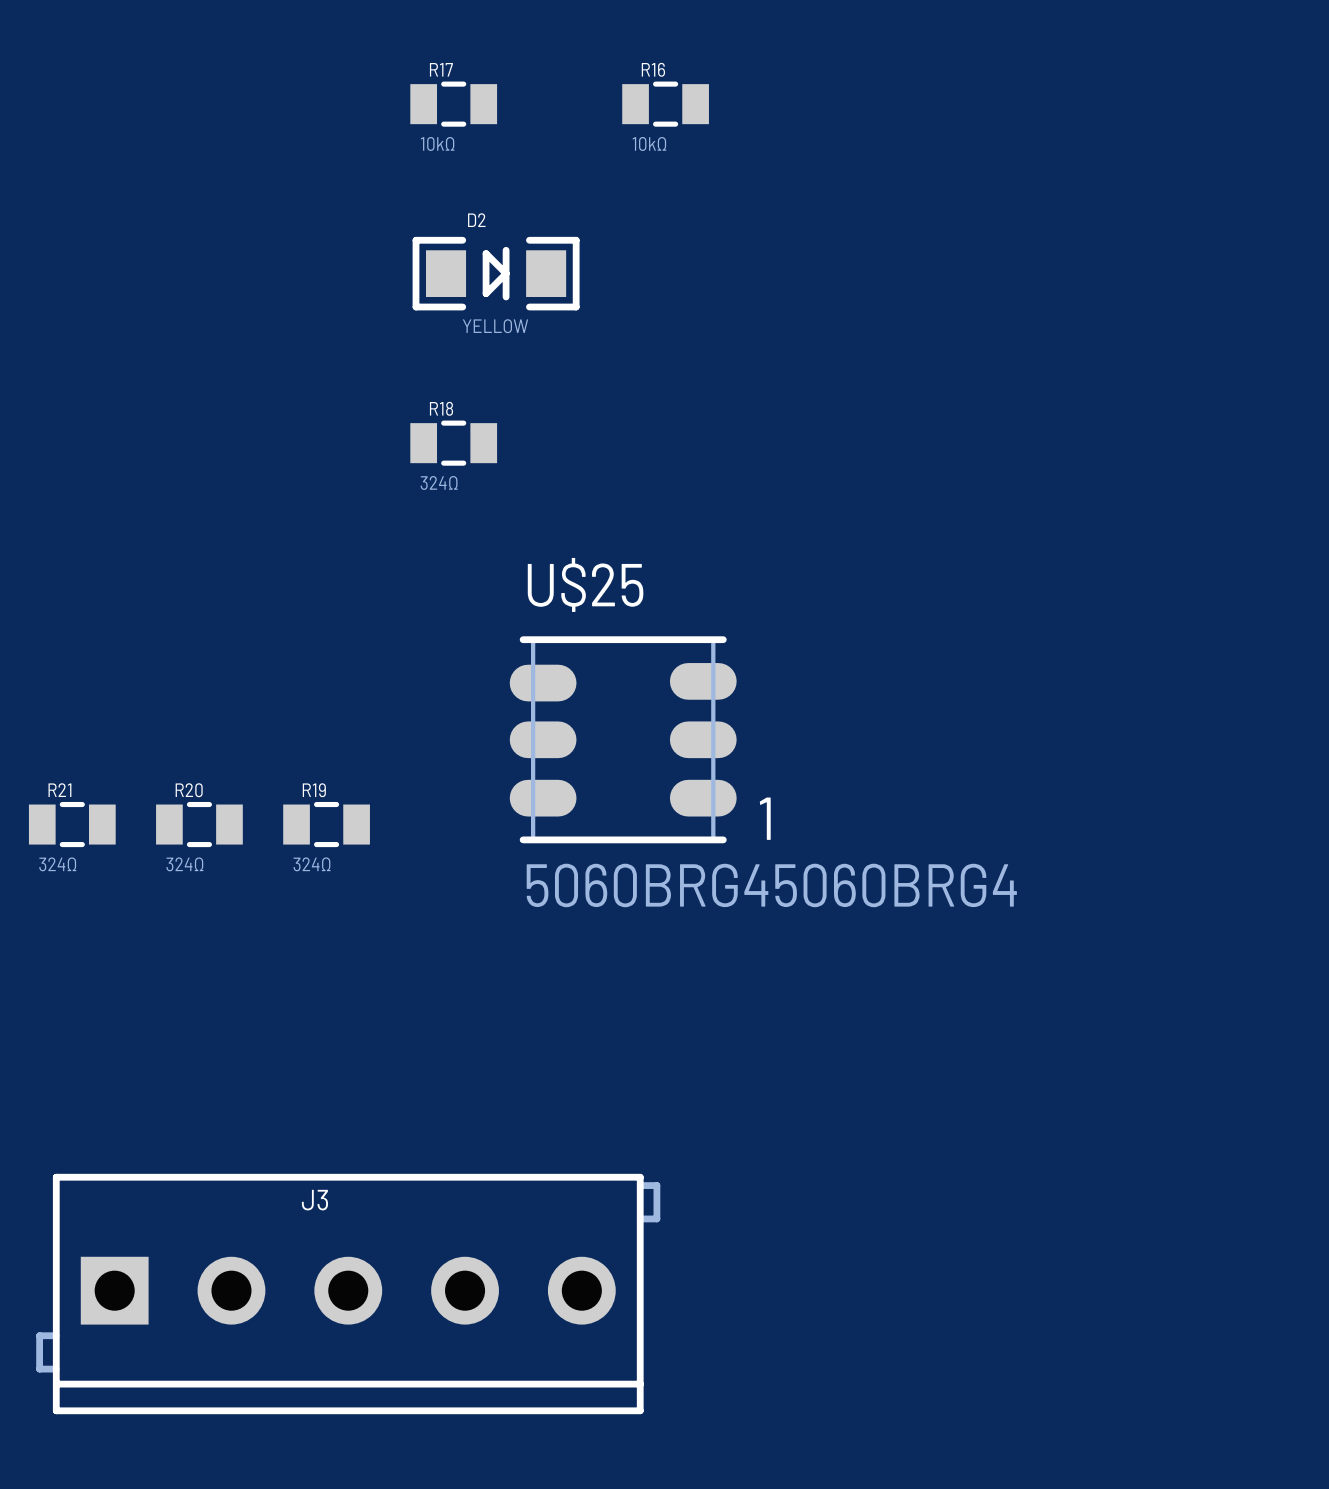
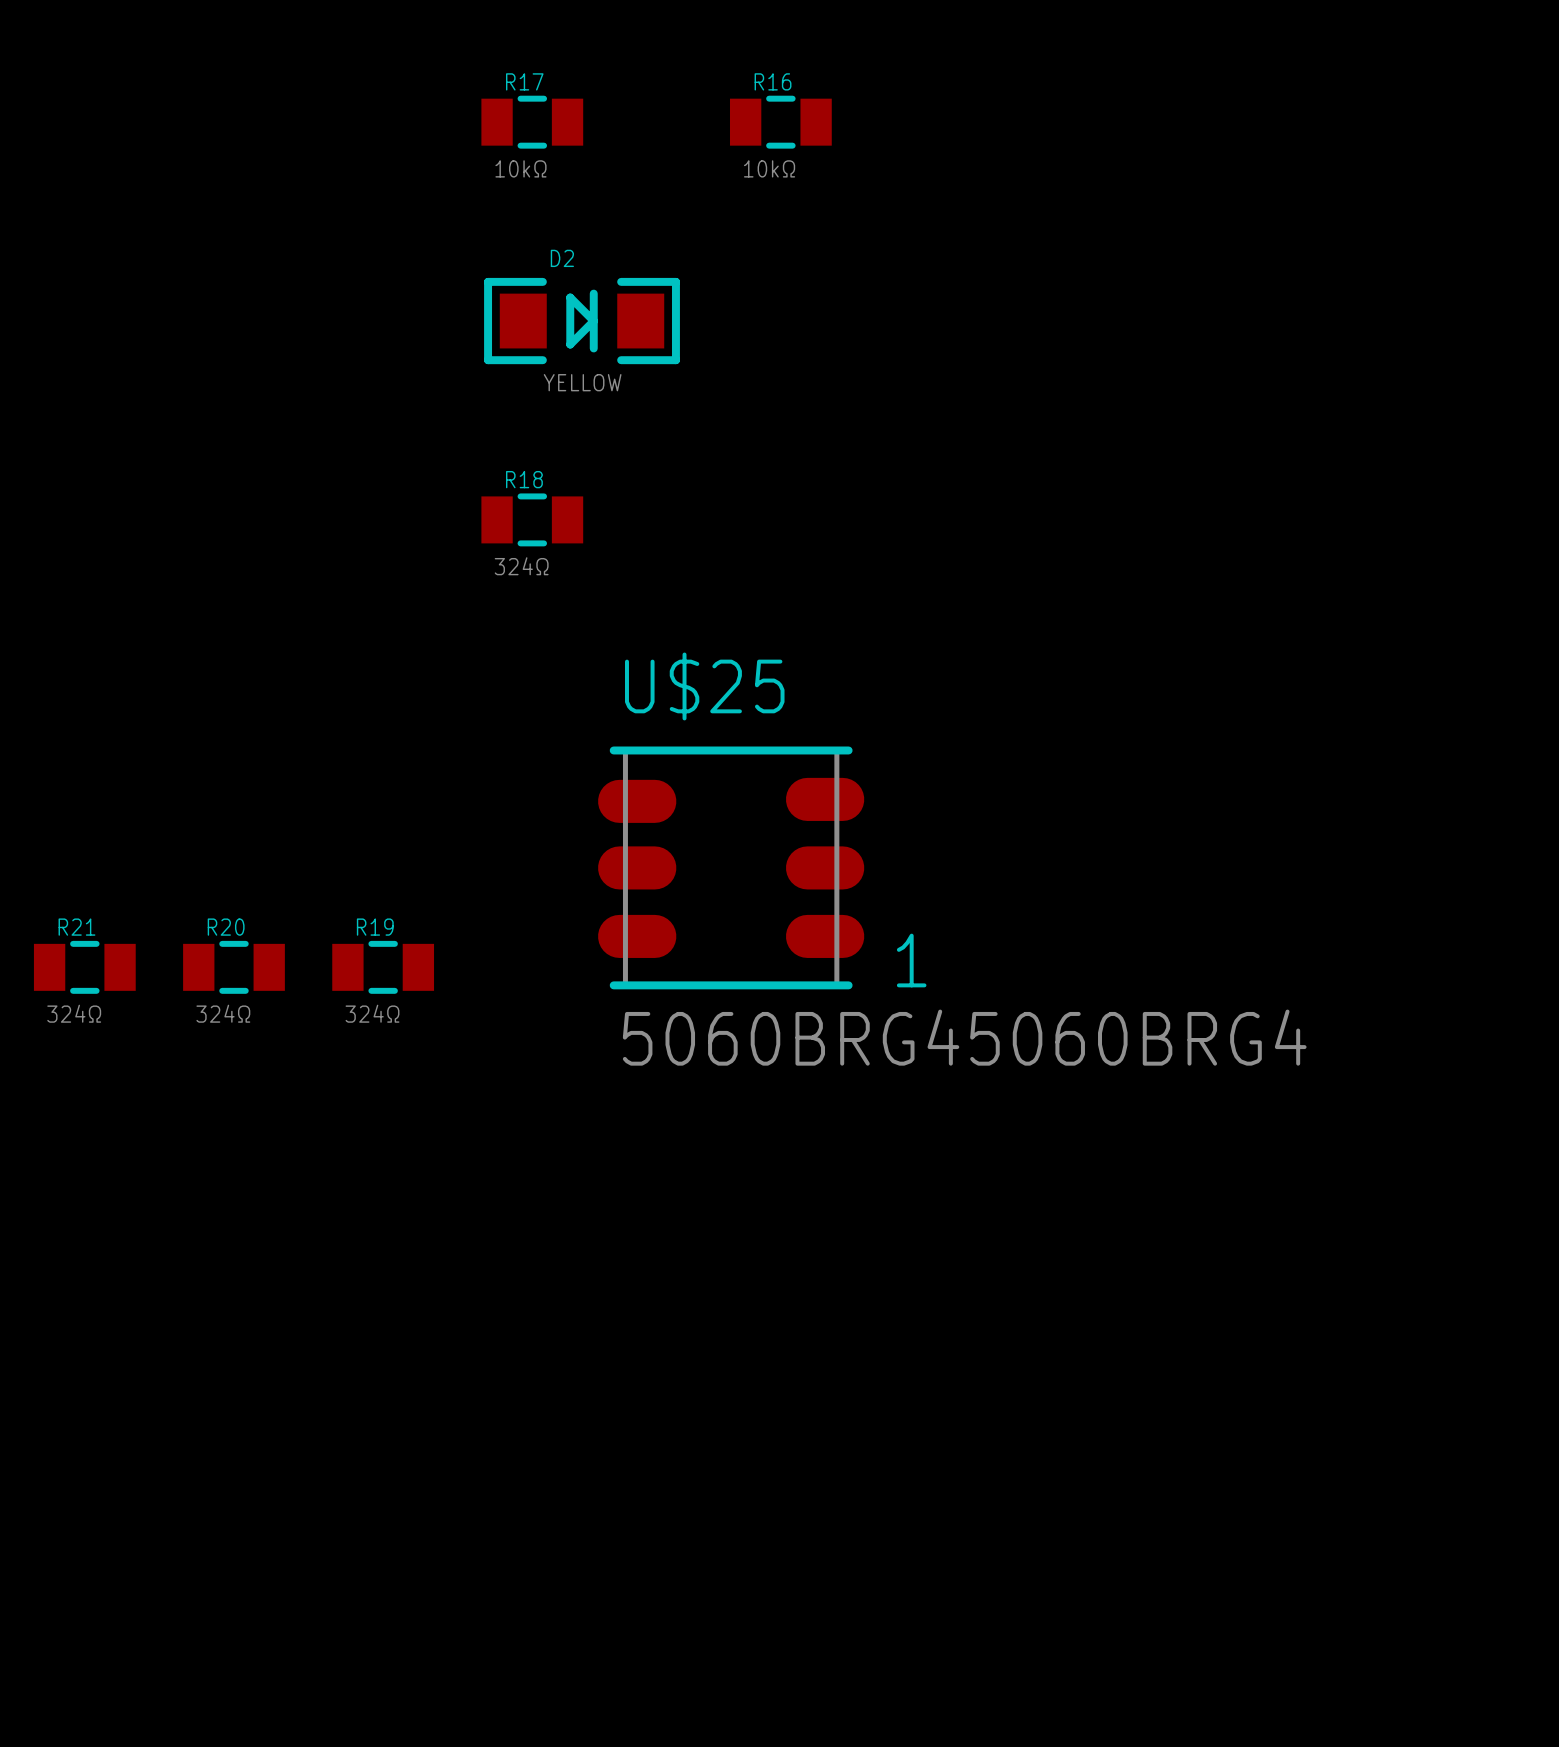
J3: (348, 1294) -> none

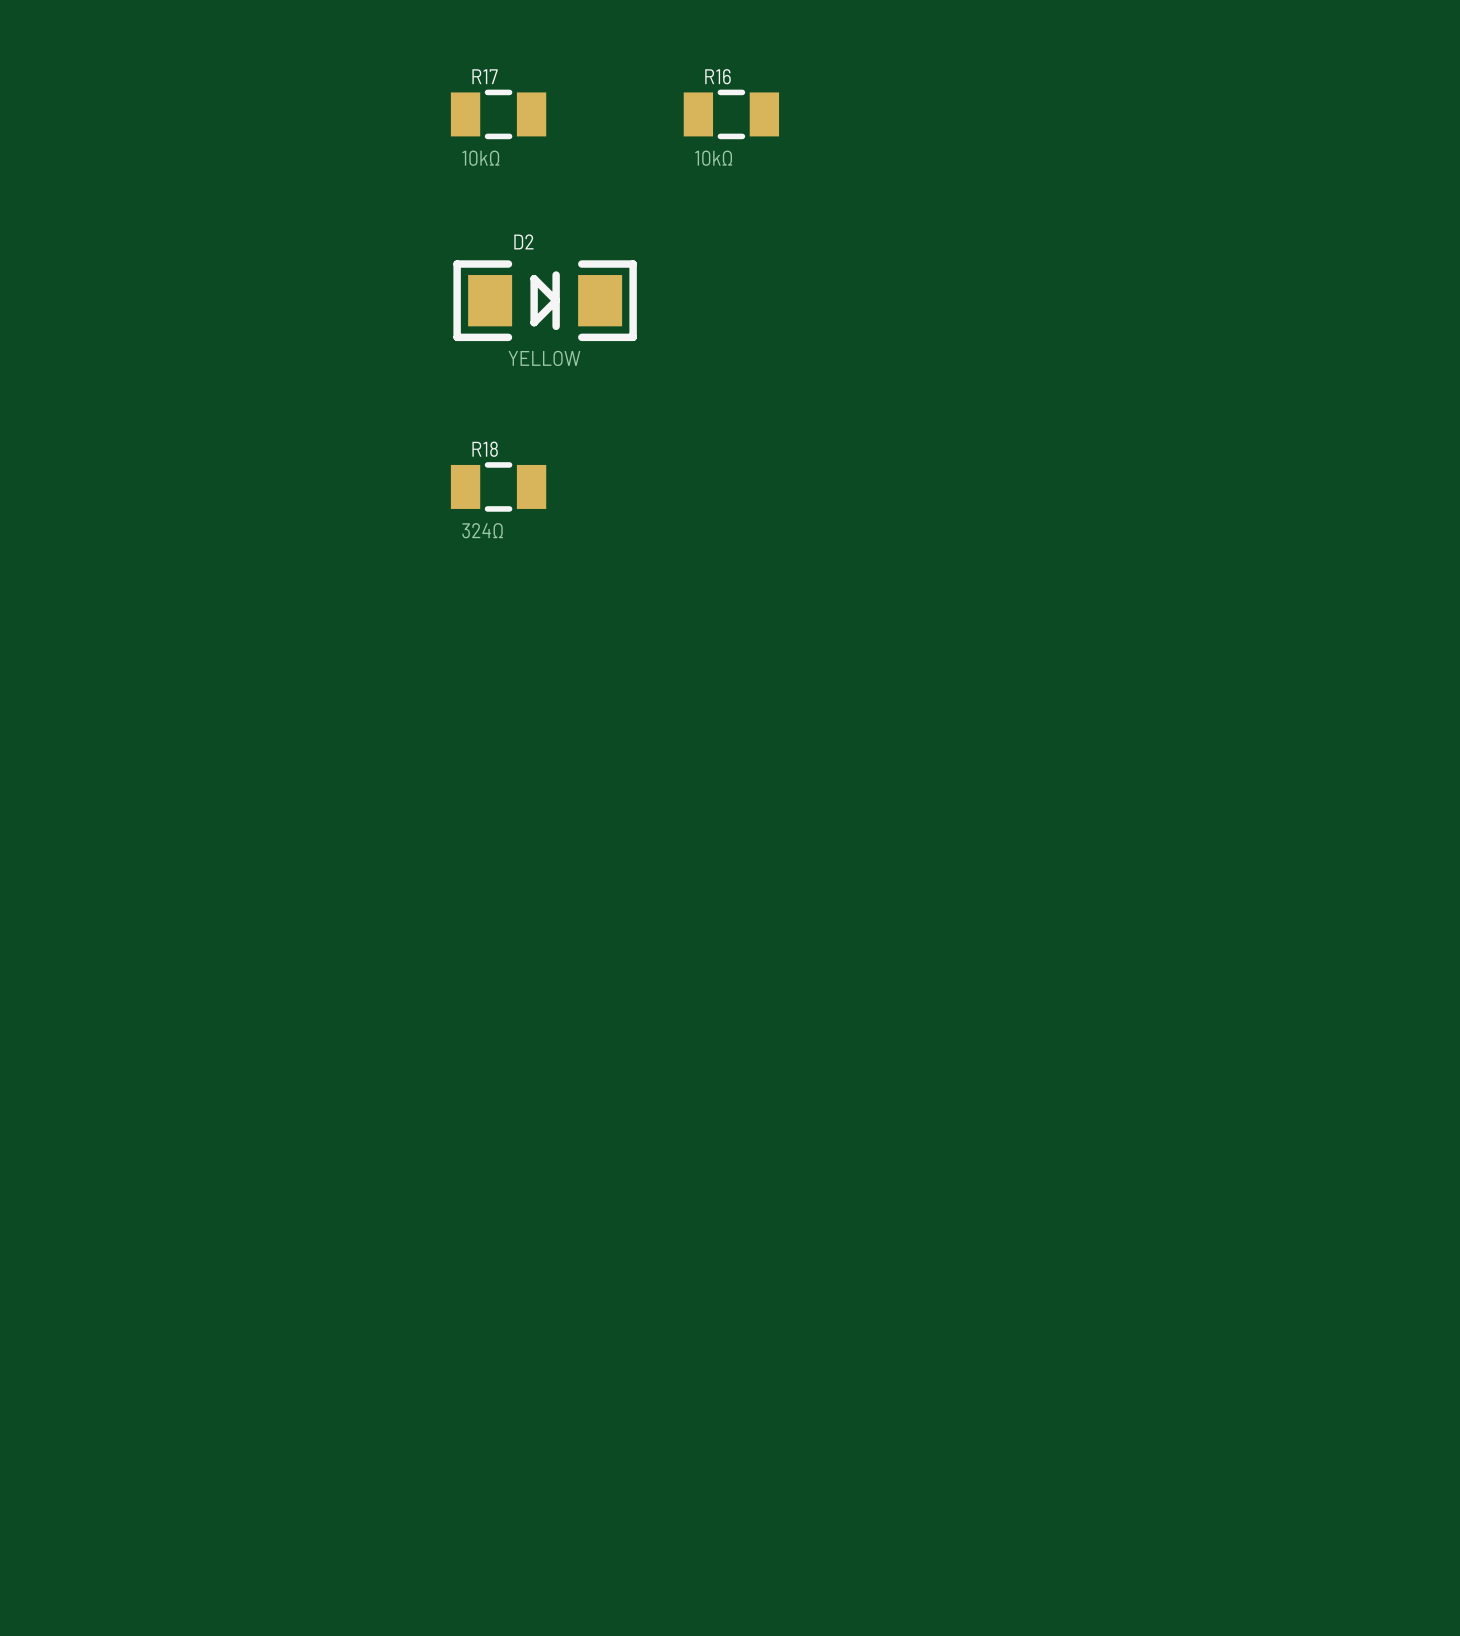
U$25: 5060BRG45060BRG4 (731, 867) -> none
R21: 324Ω (84, 967) -> none
R20: 324Ω (233, 967) -> none
R19: 324Ω (383, 967) -> none

